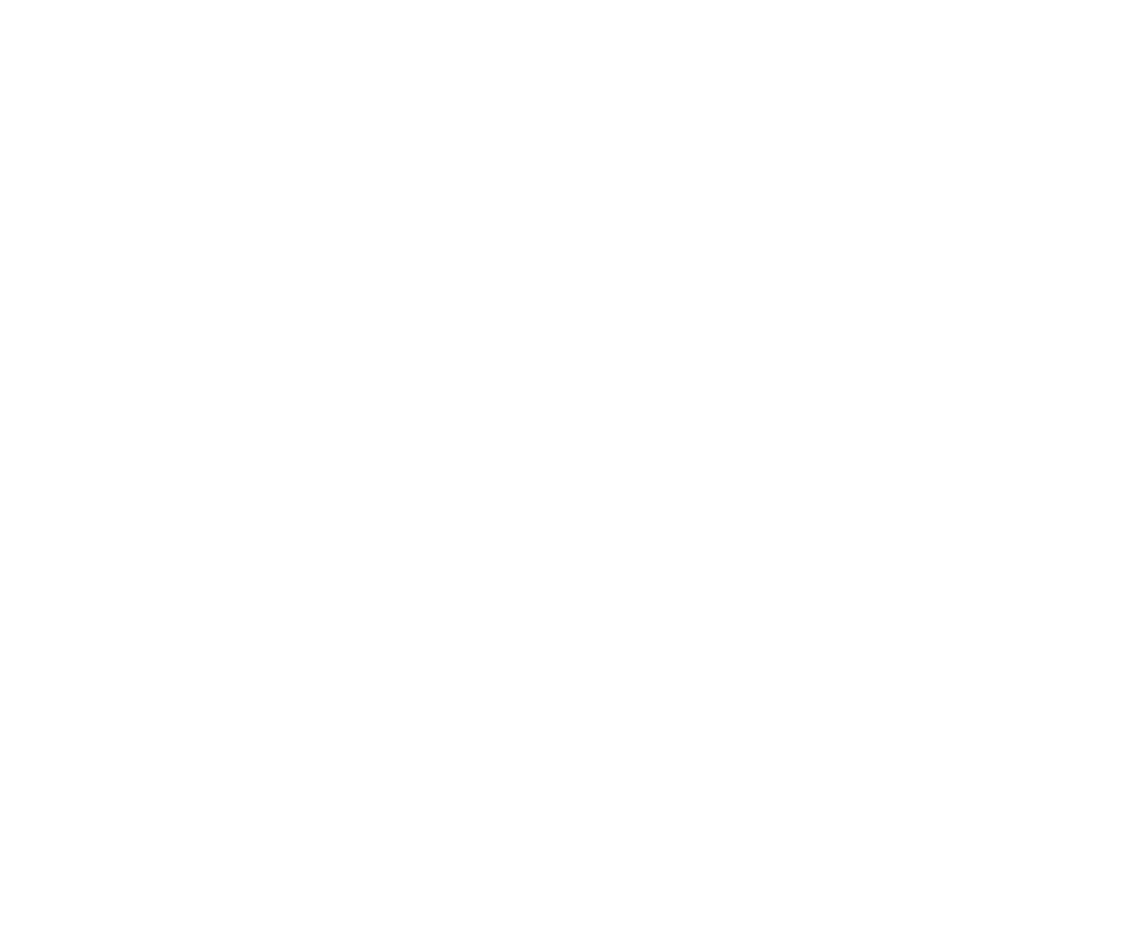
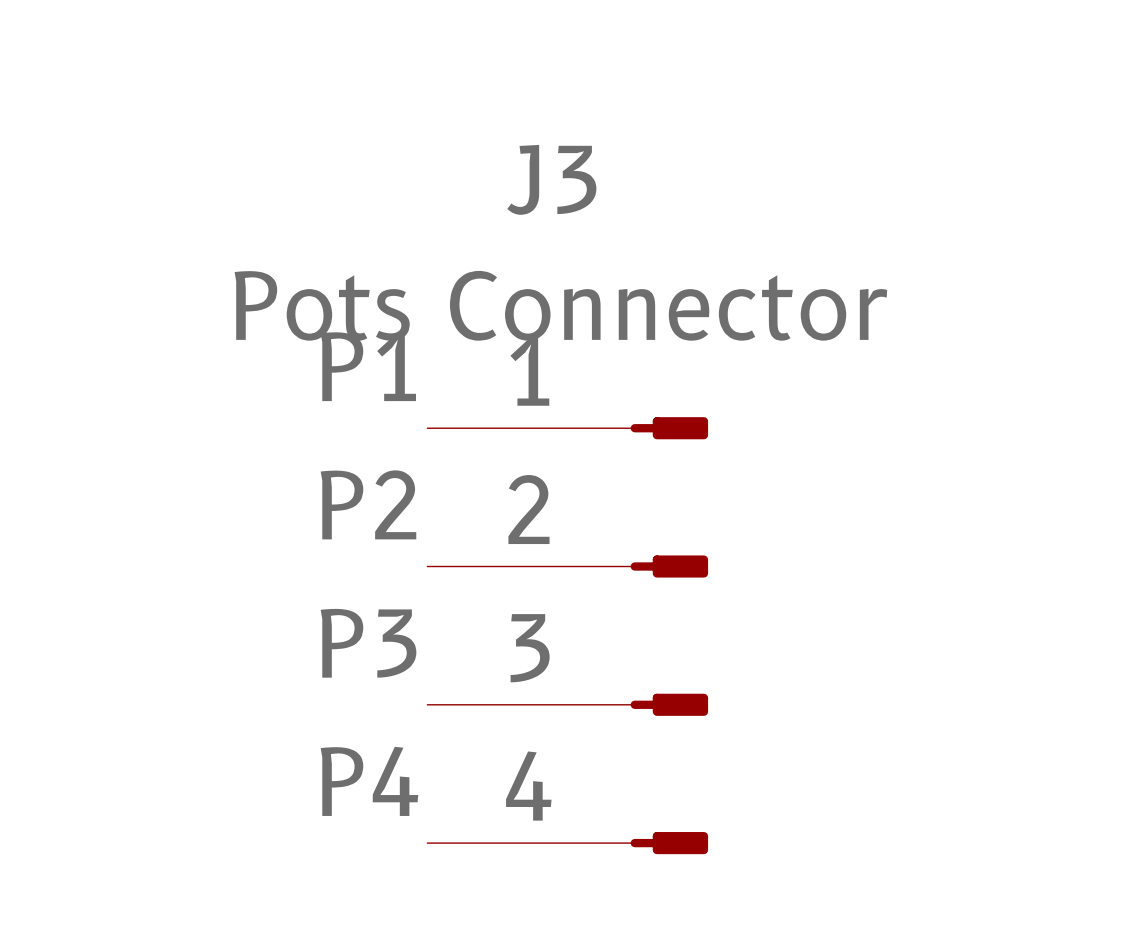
label: none -> P1 (368, 366)
label: none -> P2 (368, 504)
J3: none -> Pots Connector (567, 635)
label: none -> P3 (368, 643)
label: none -> P4 (369, 781)

